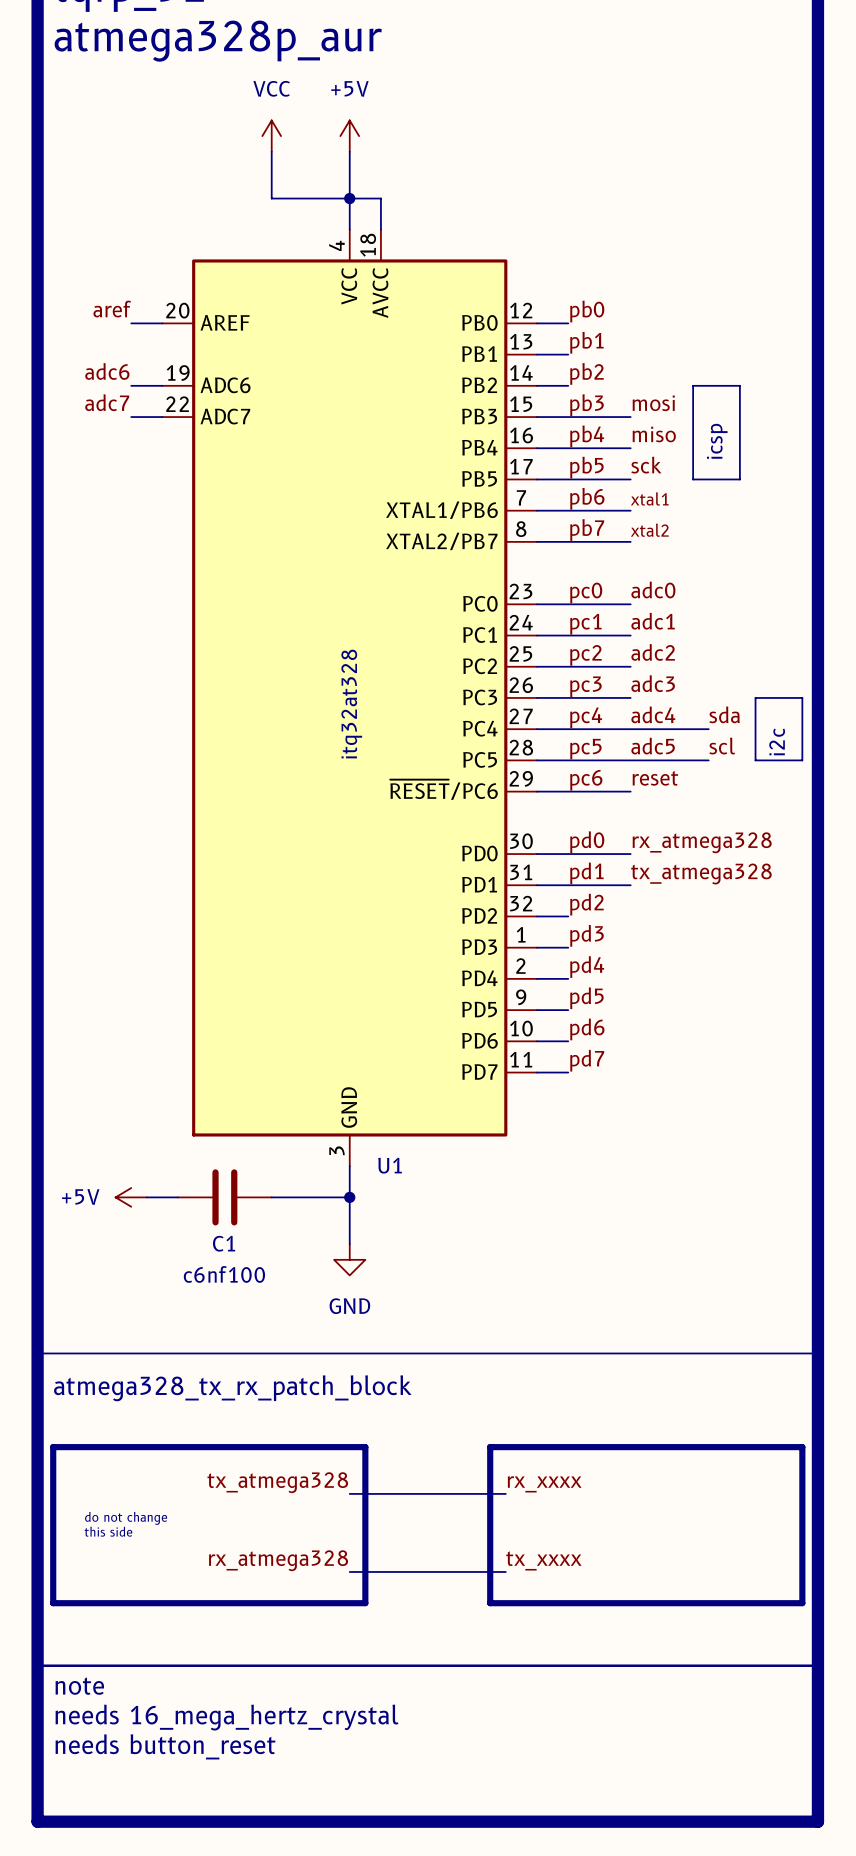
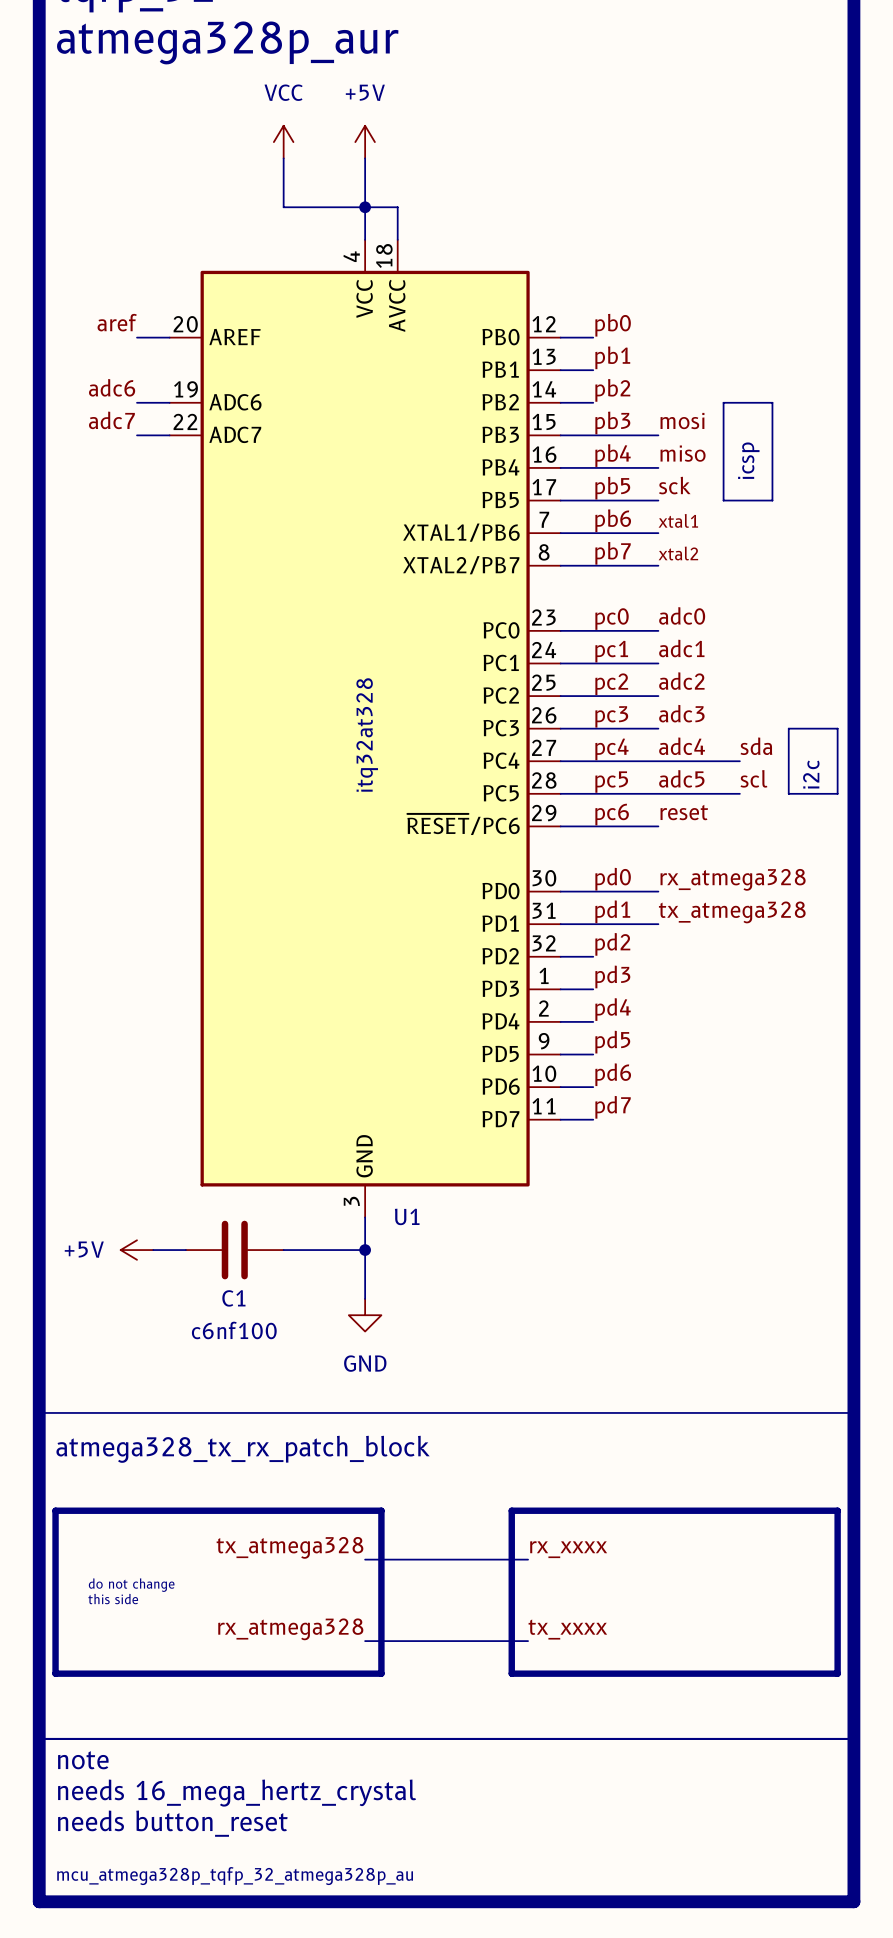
text: none -> mcu_atmega328p_tqfp_32_atmega328p_au (235, 1876)

